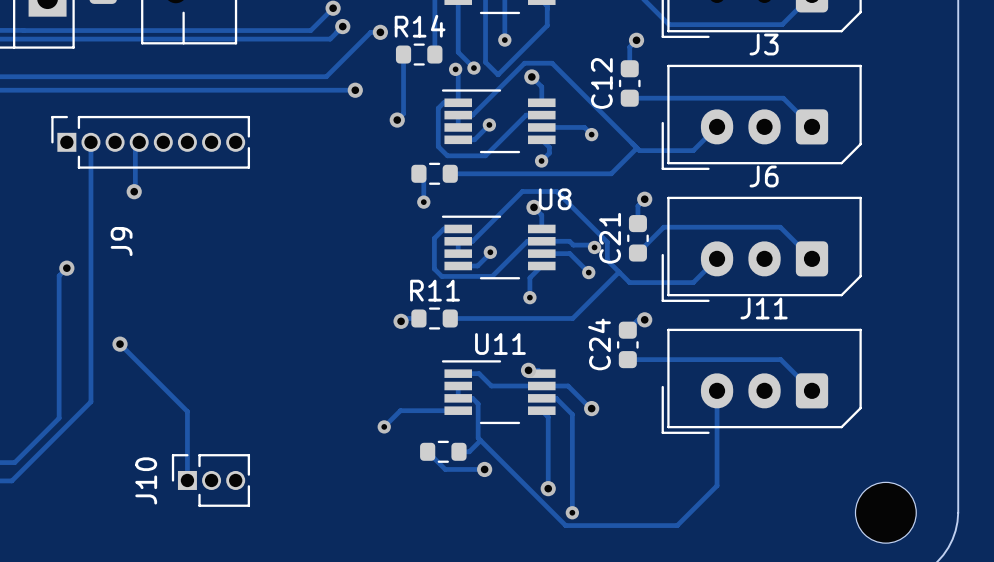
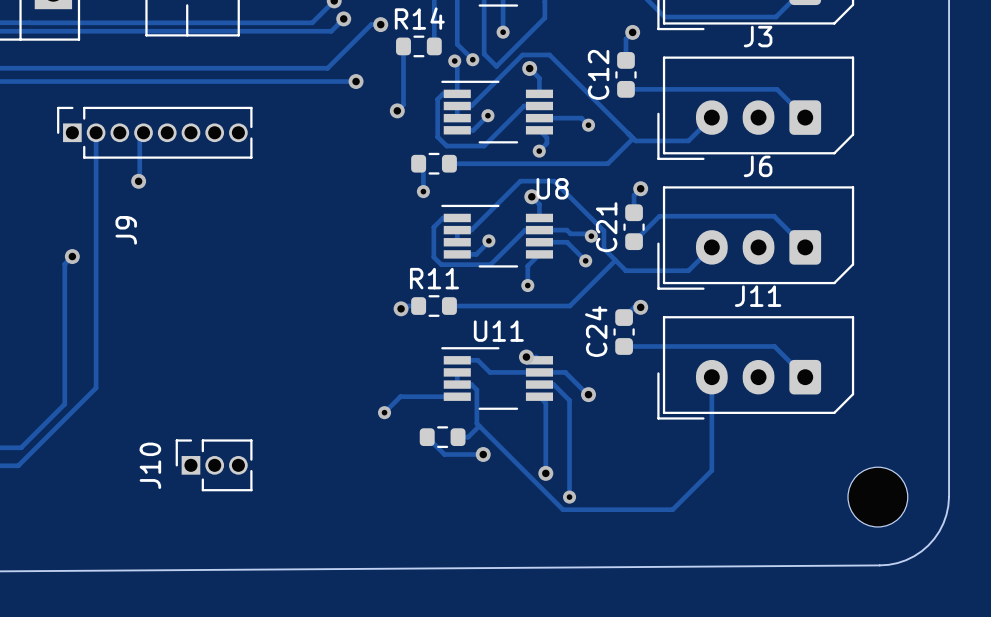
track: (120, 344) (187, 411) (187, 480) -> none
via: (120, 344) -> none

